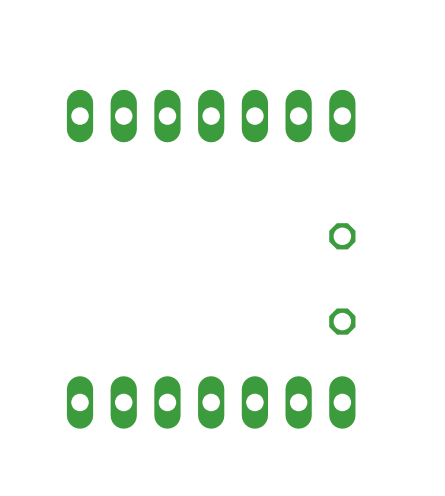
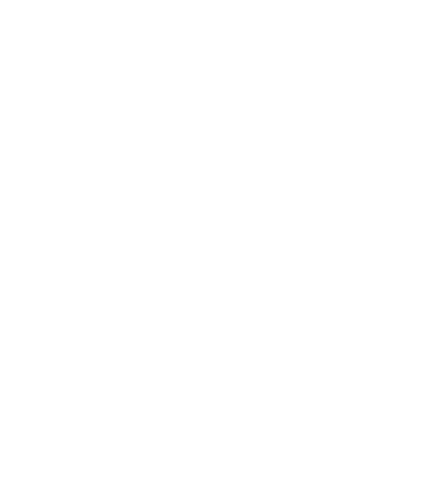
part: (211, 116) -> none
part: (342, 236) -> none
part: (342, 321) -> none
part: (211, 402) -> none

